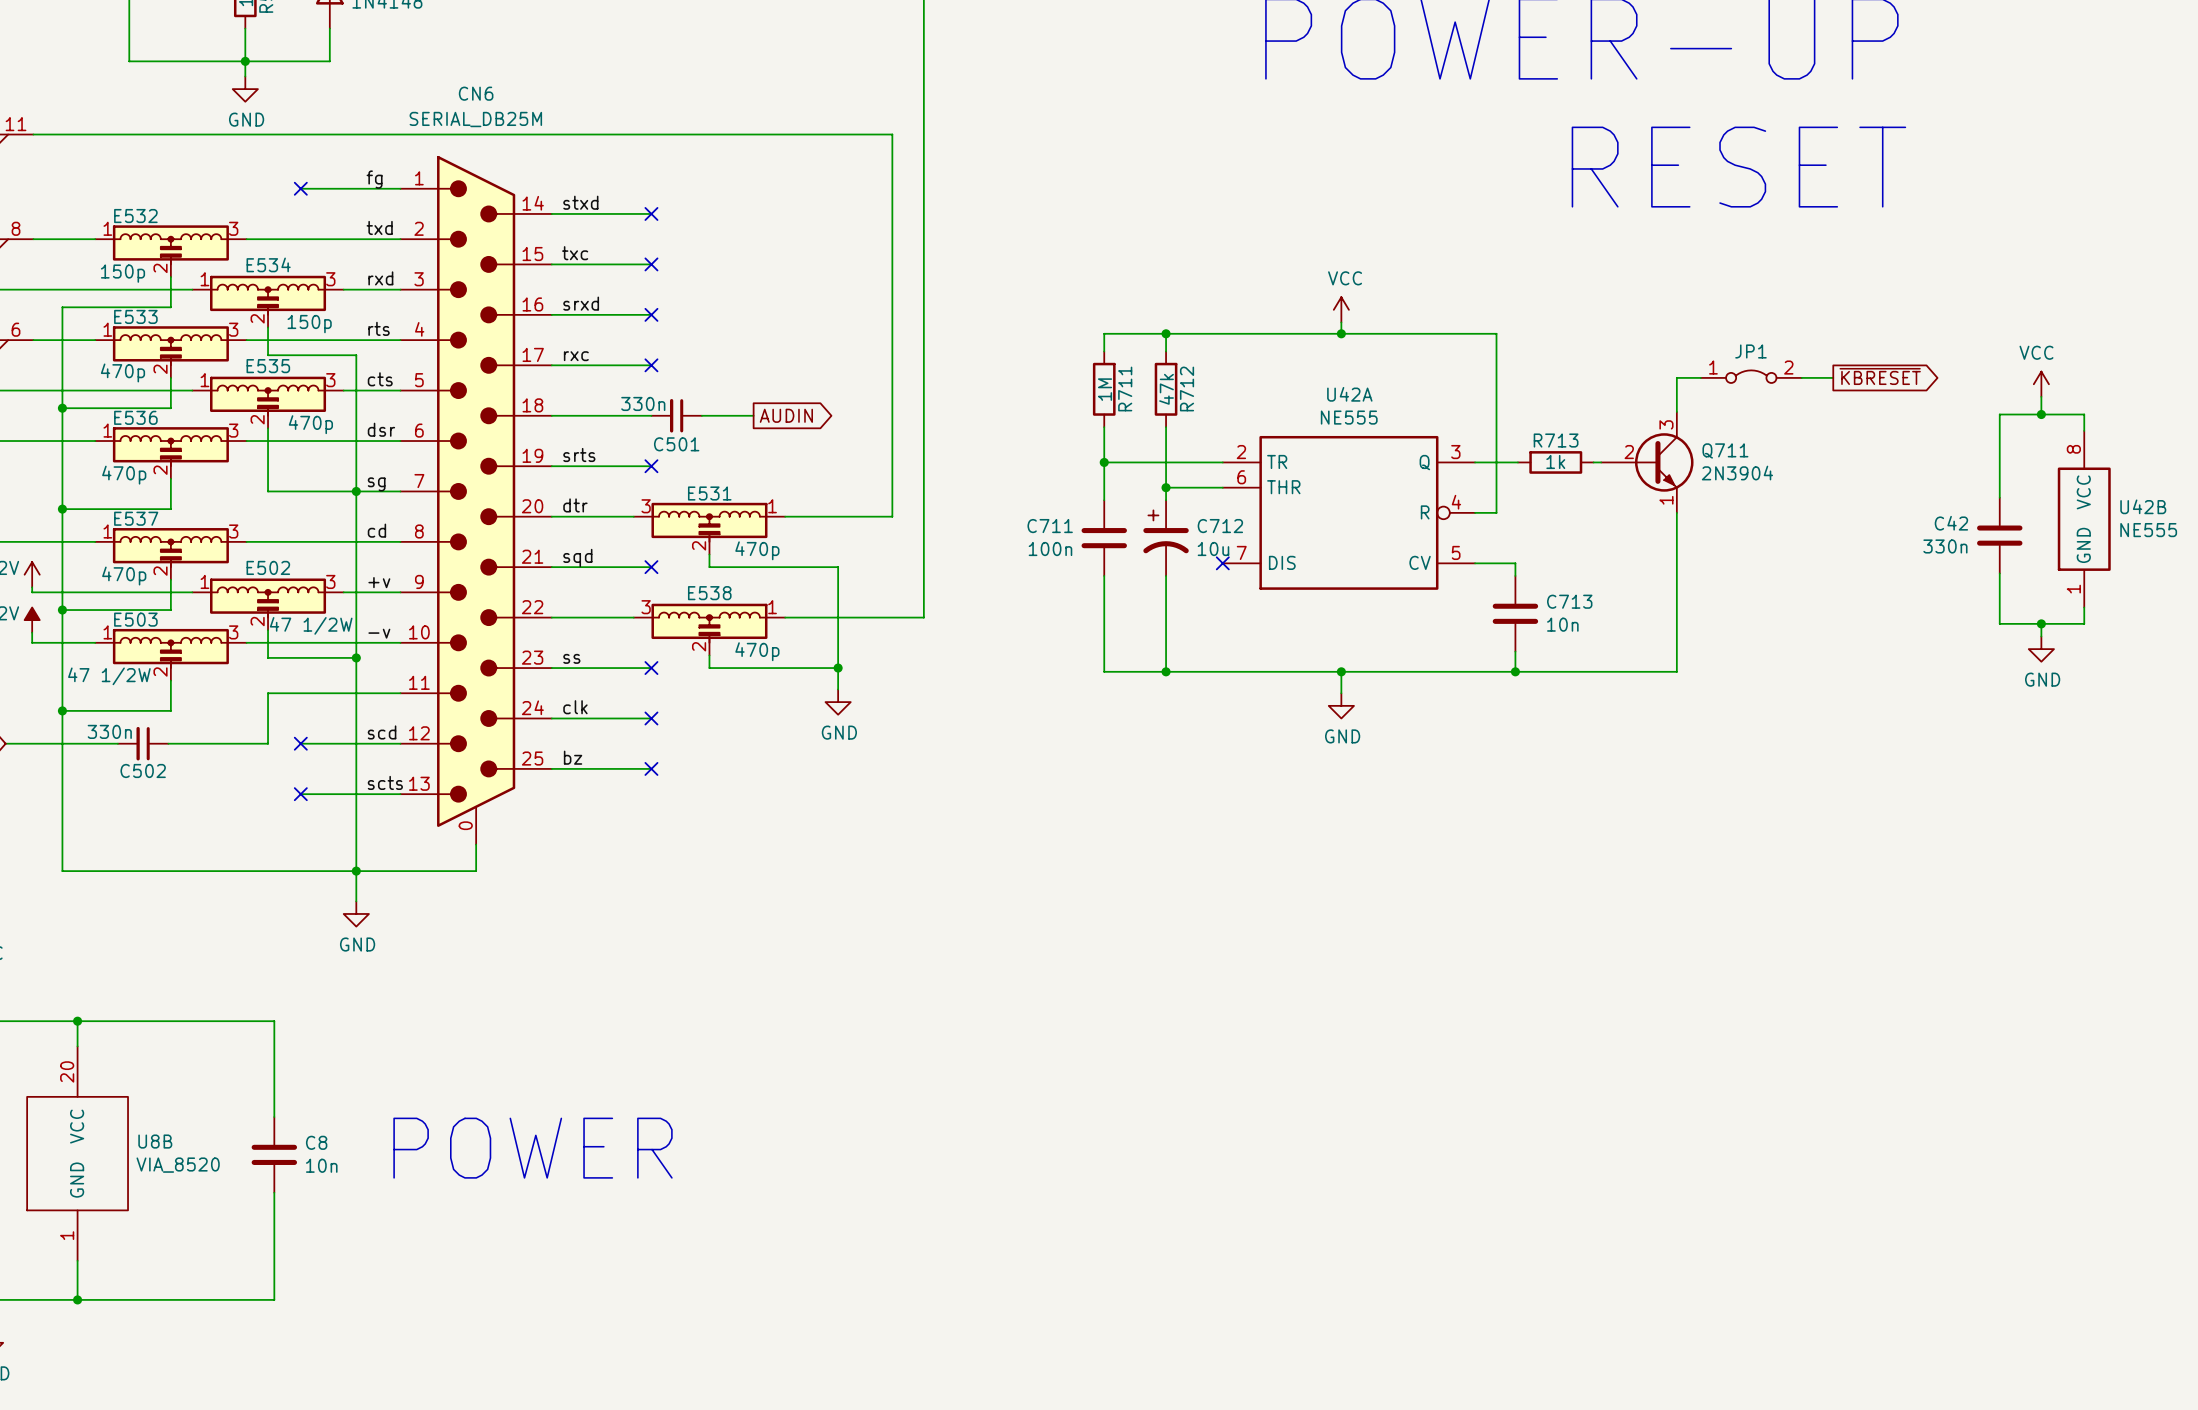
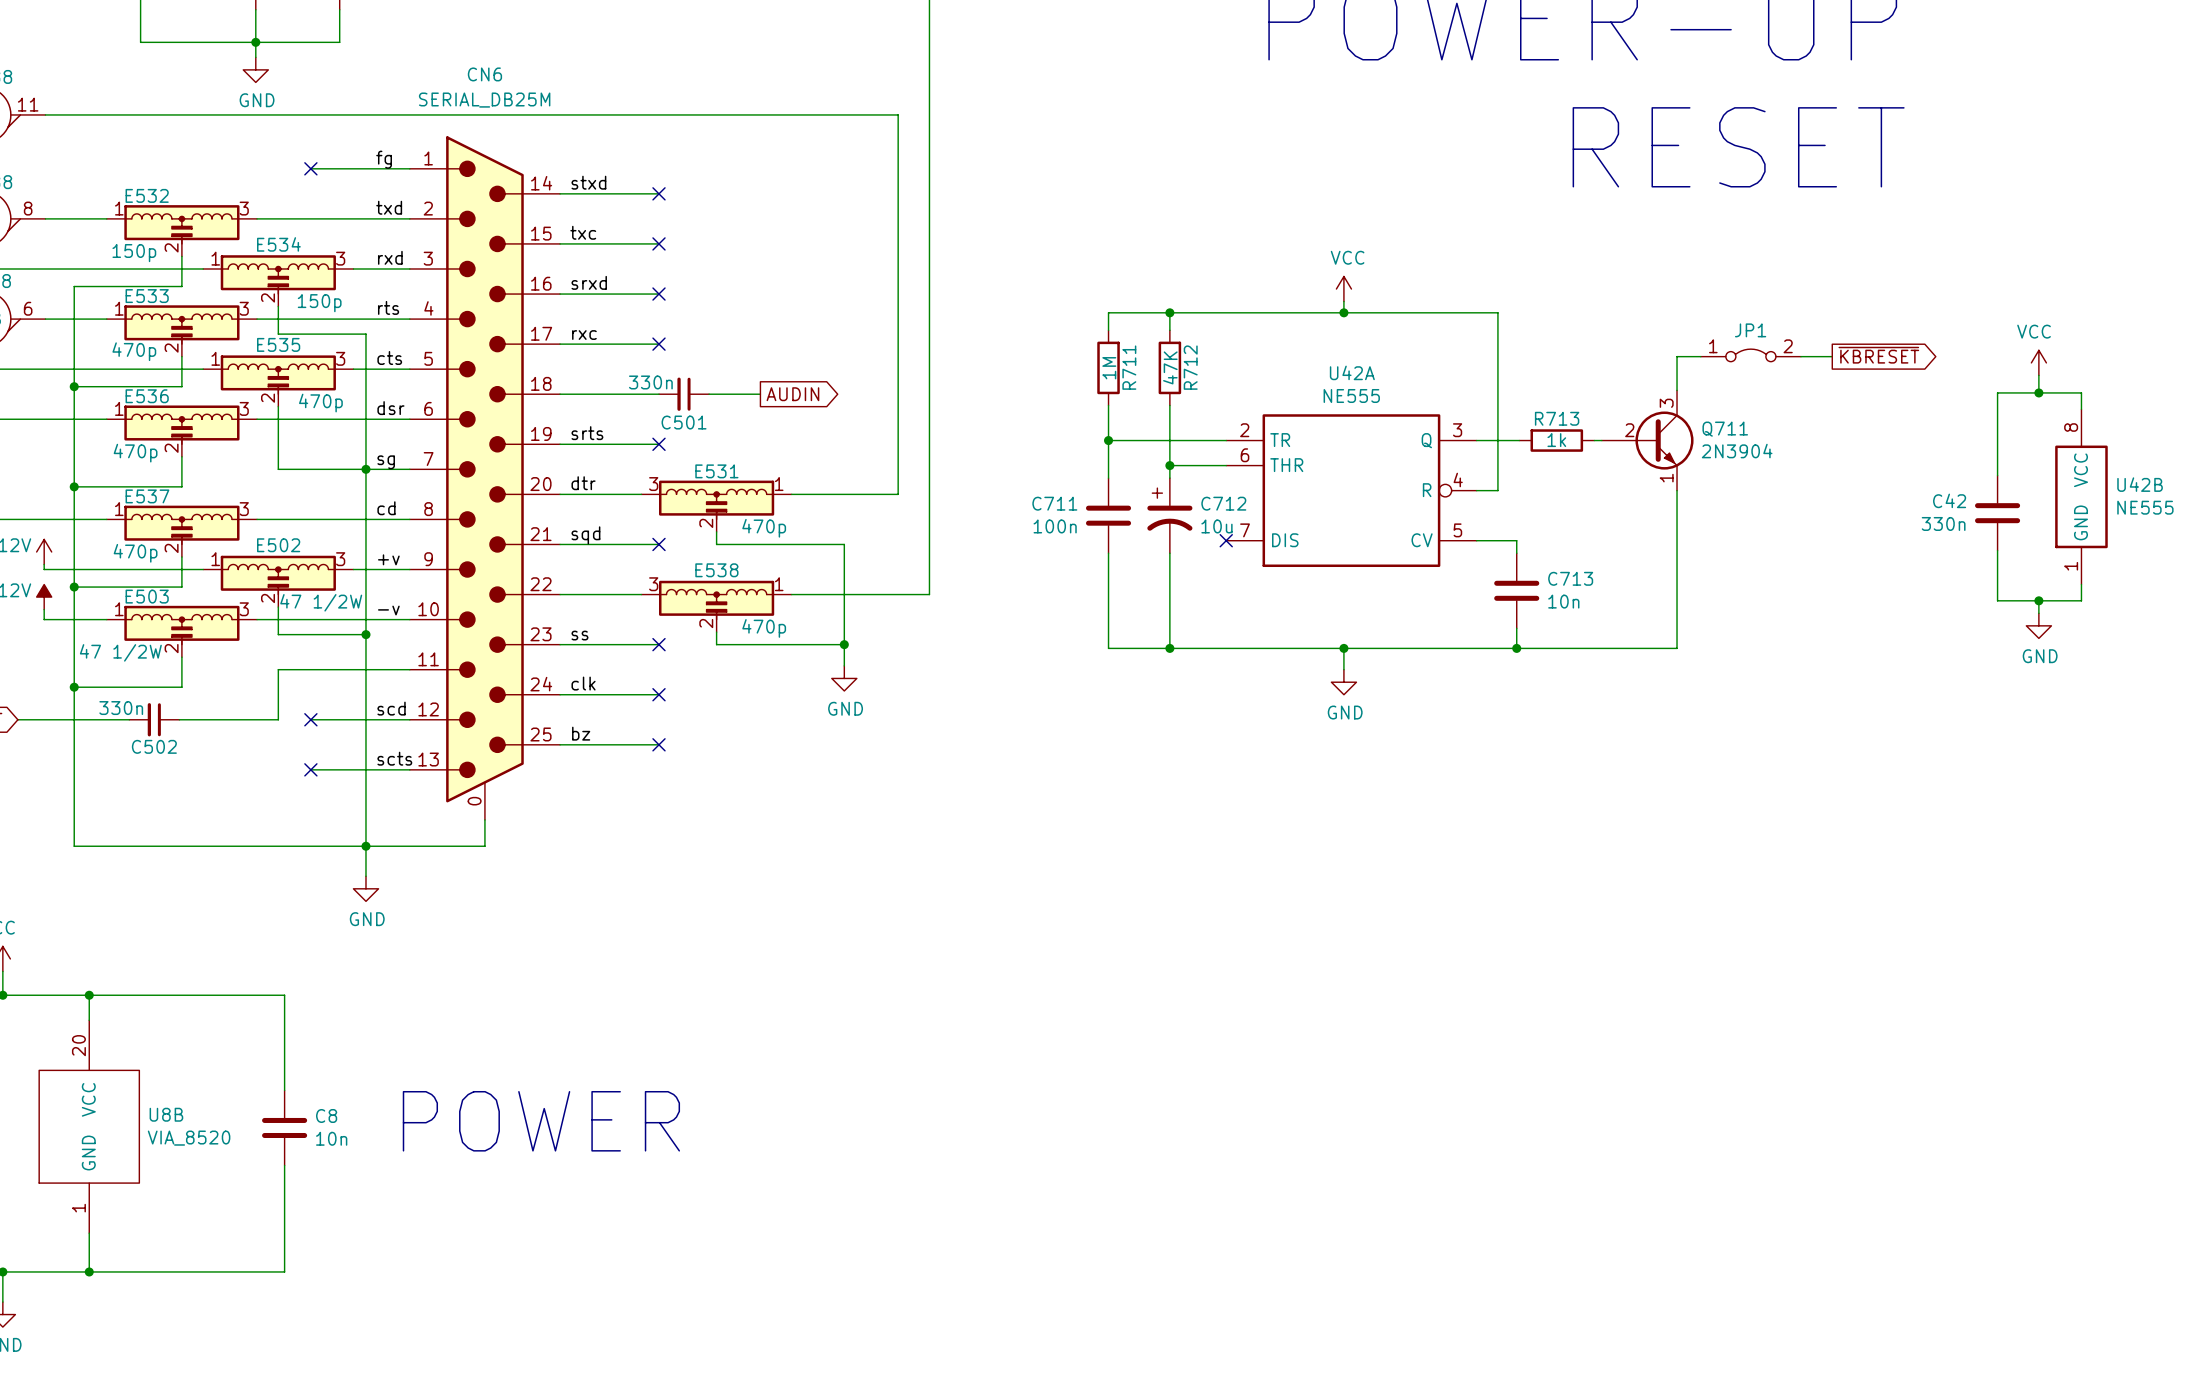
R712 value: 47k (1166, 389) -> 47K (1170, 367)

